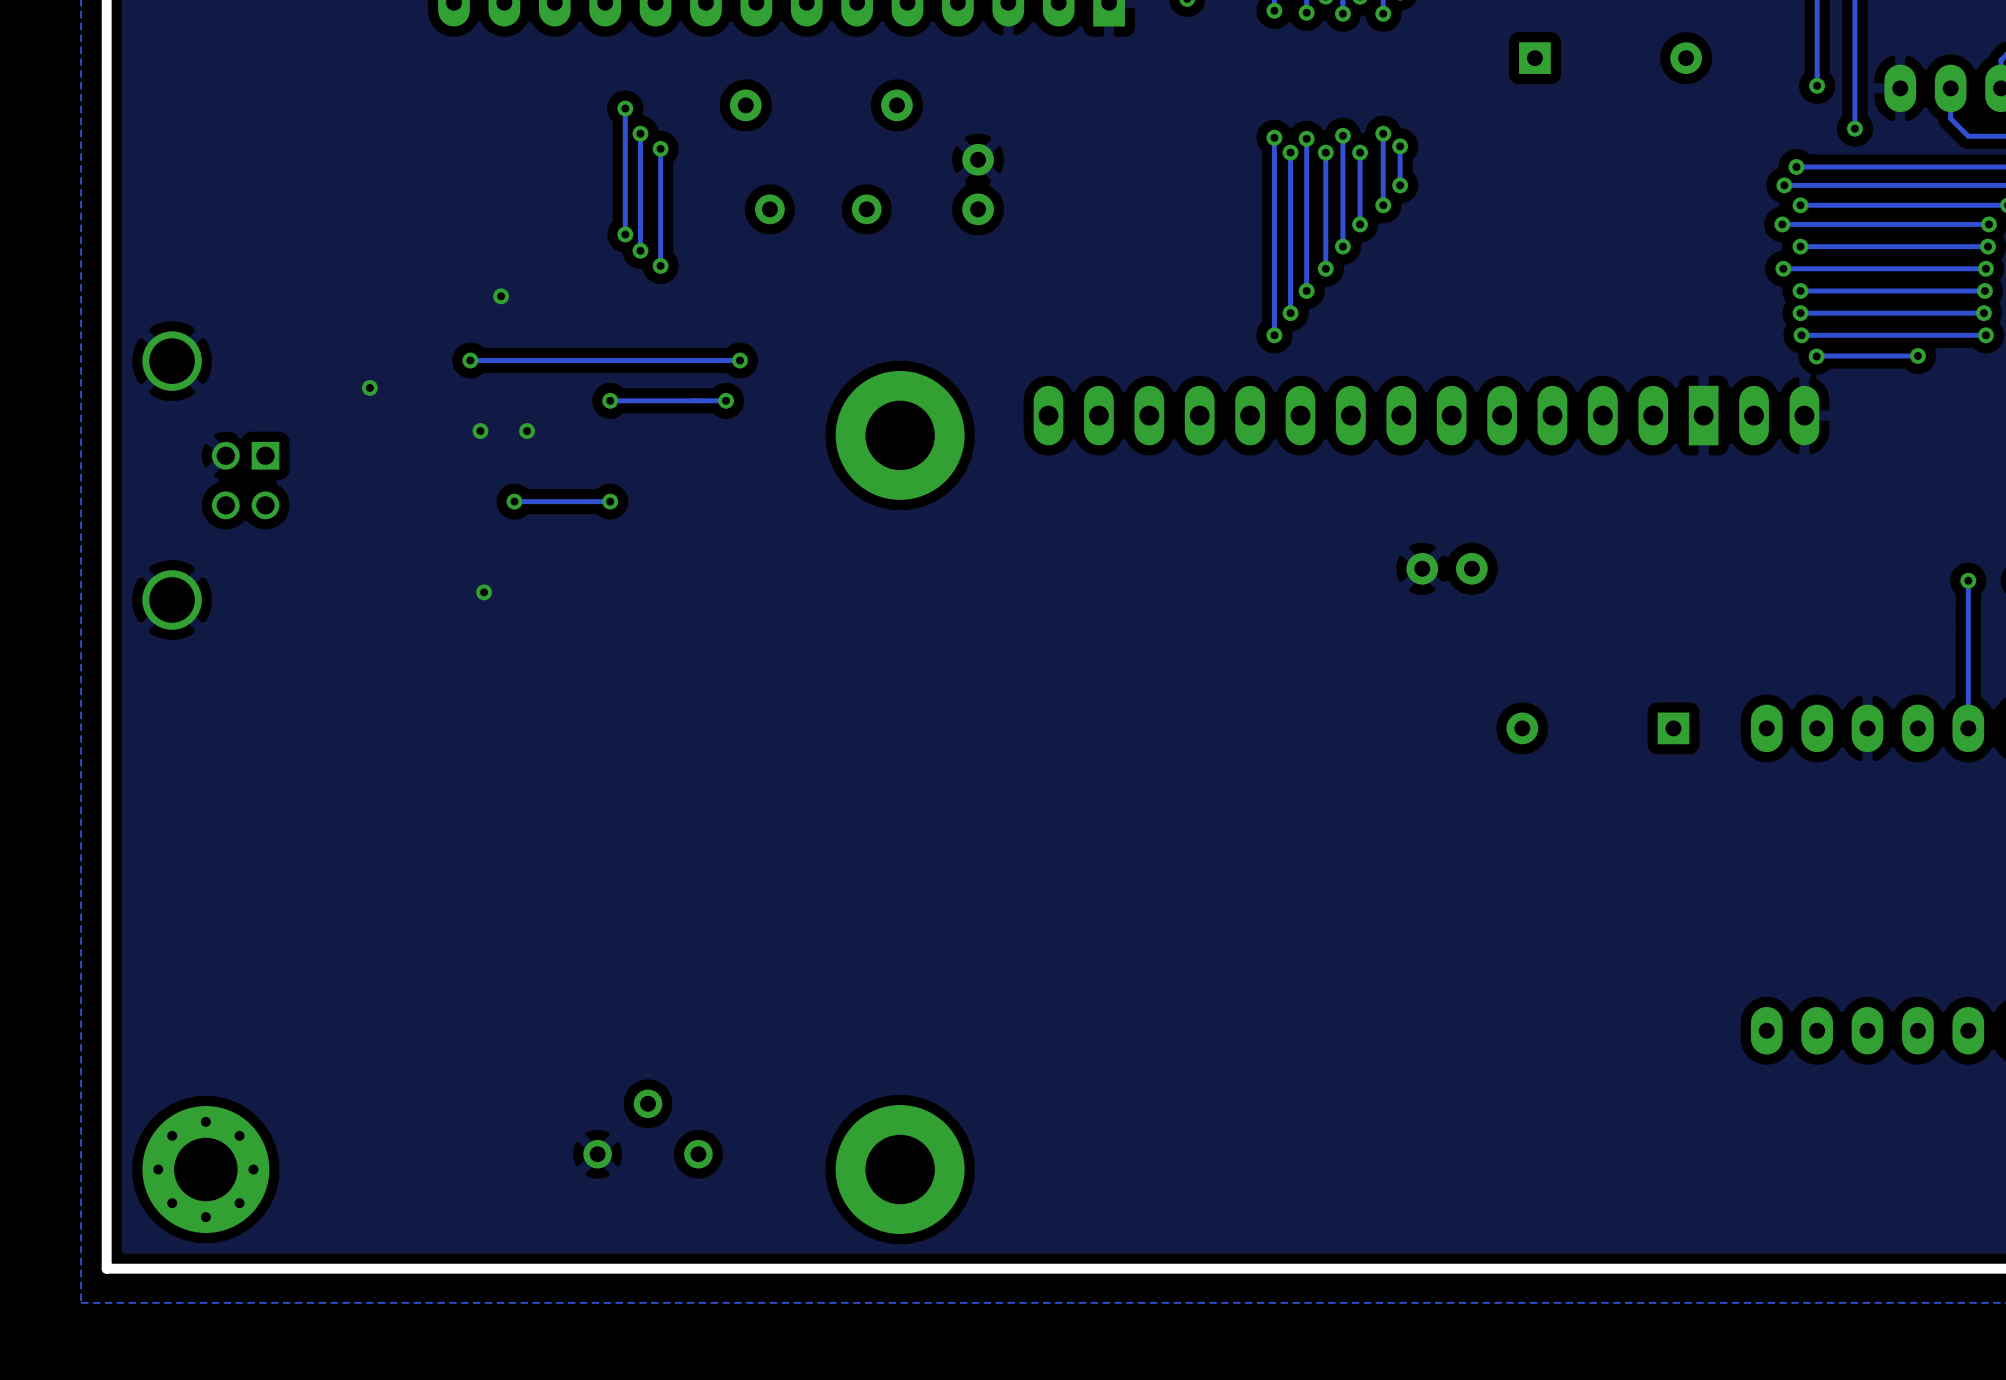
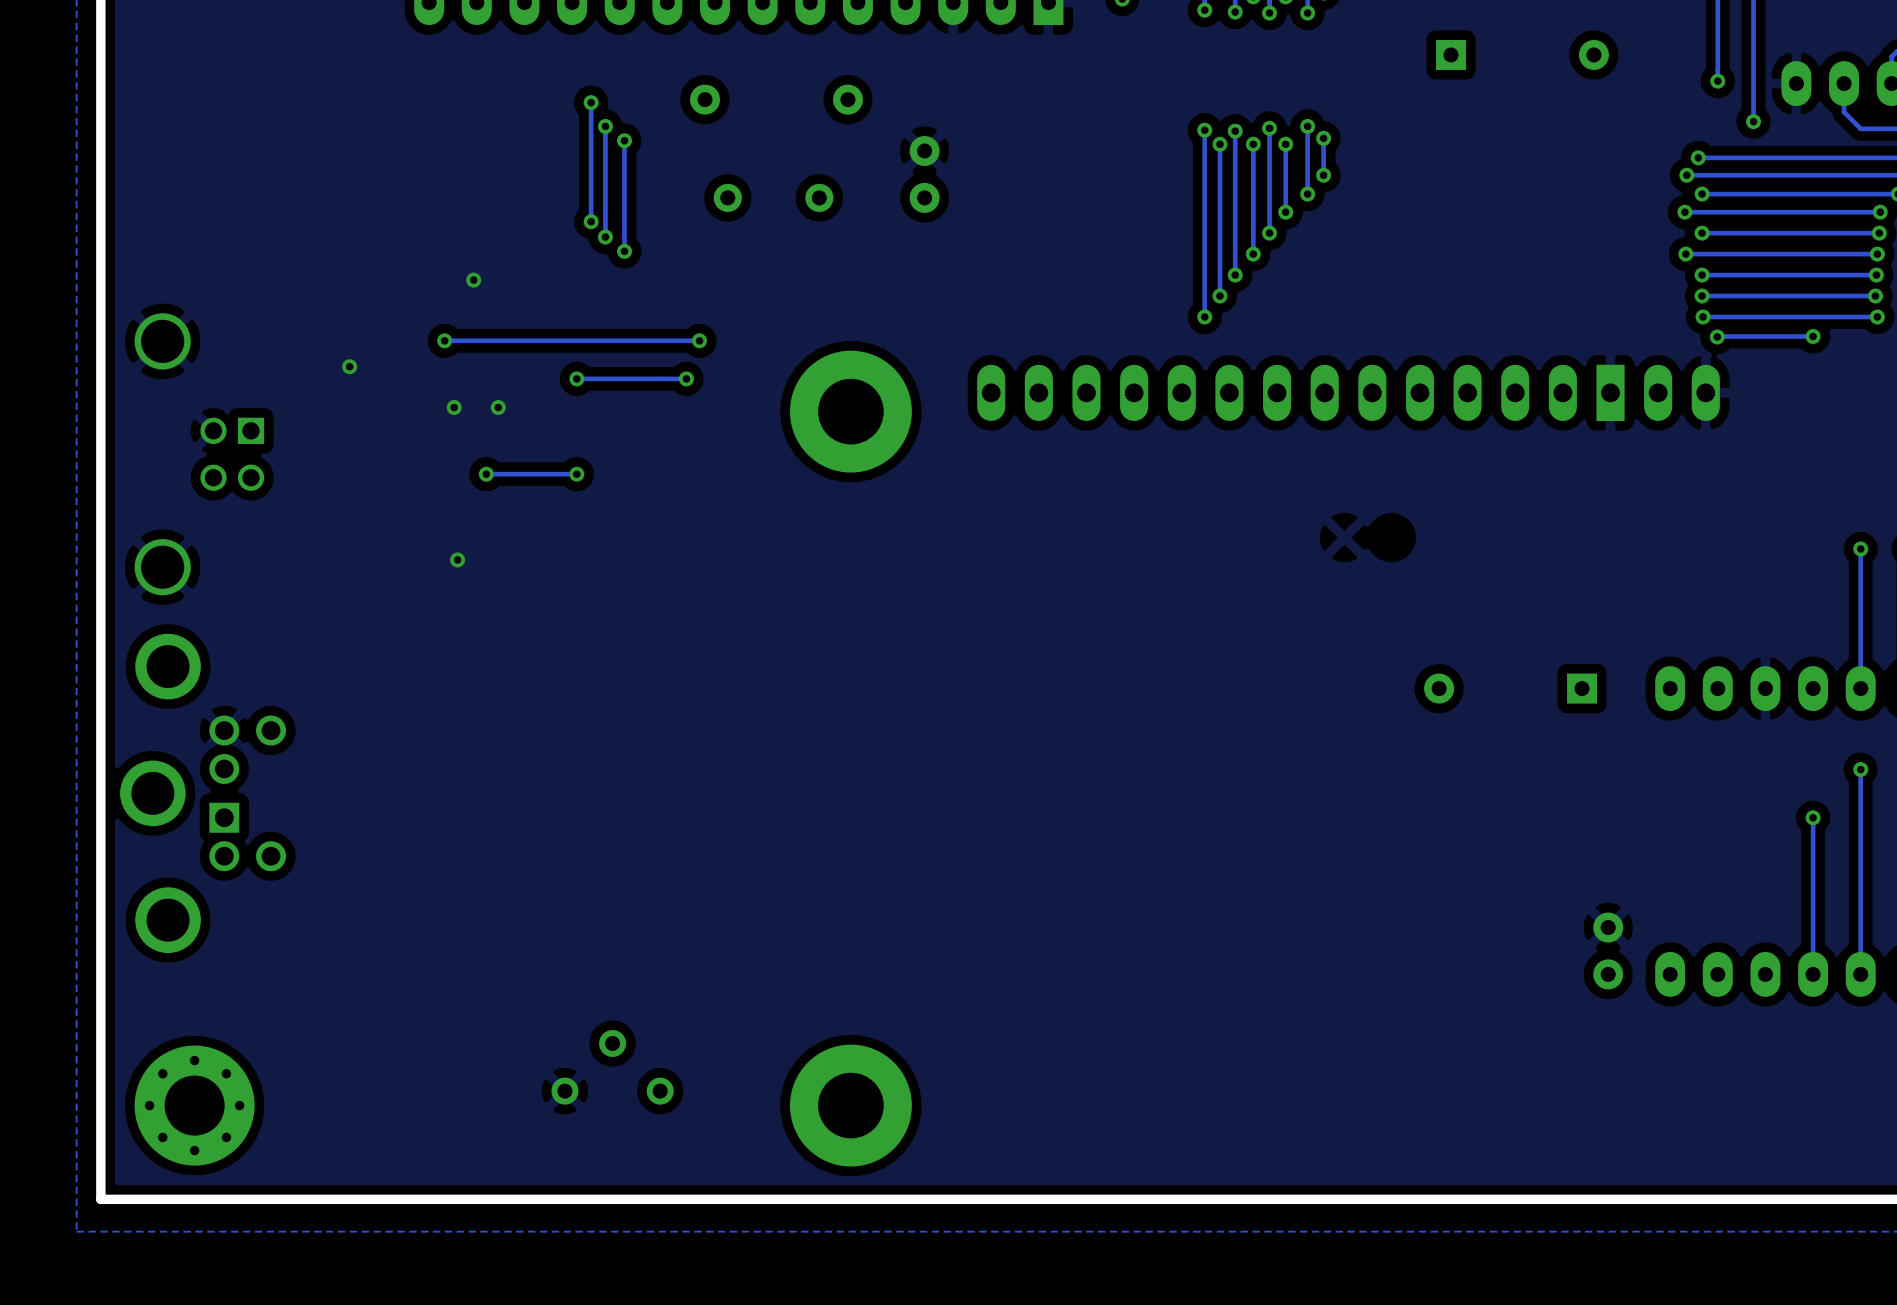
part: (1447, 568) -> none
track: none -> (1860, 769) (1860, 974)
via: none -> (1860, 769)
part: none -> (203, 793)
track: none -> (1813, 817) (1813, 974)
via: none -> (1813, 817)
part: none -> (1608, 950)

